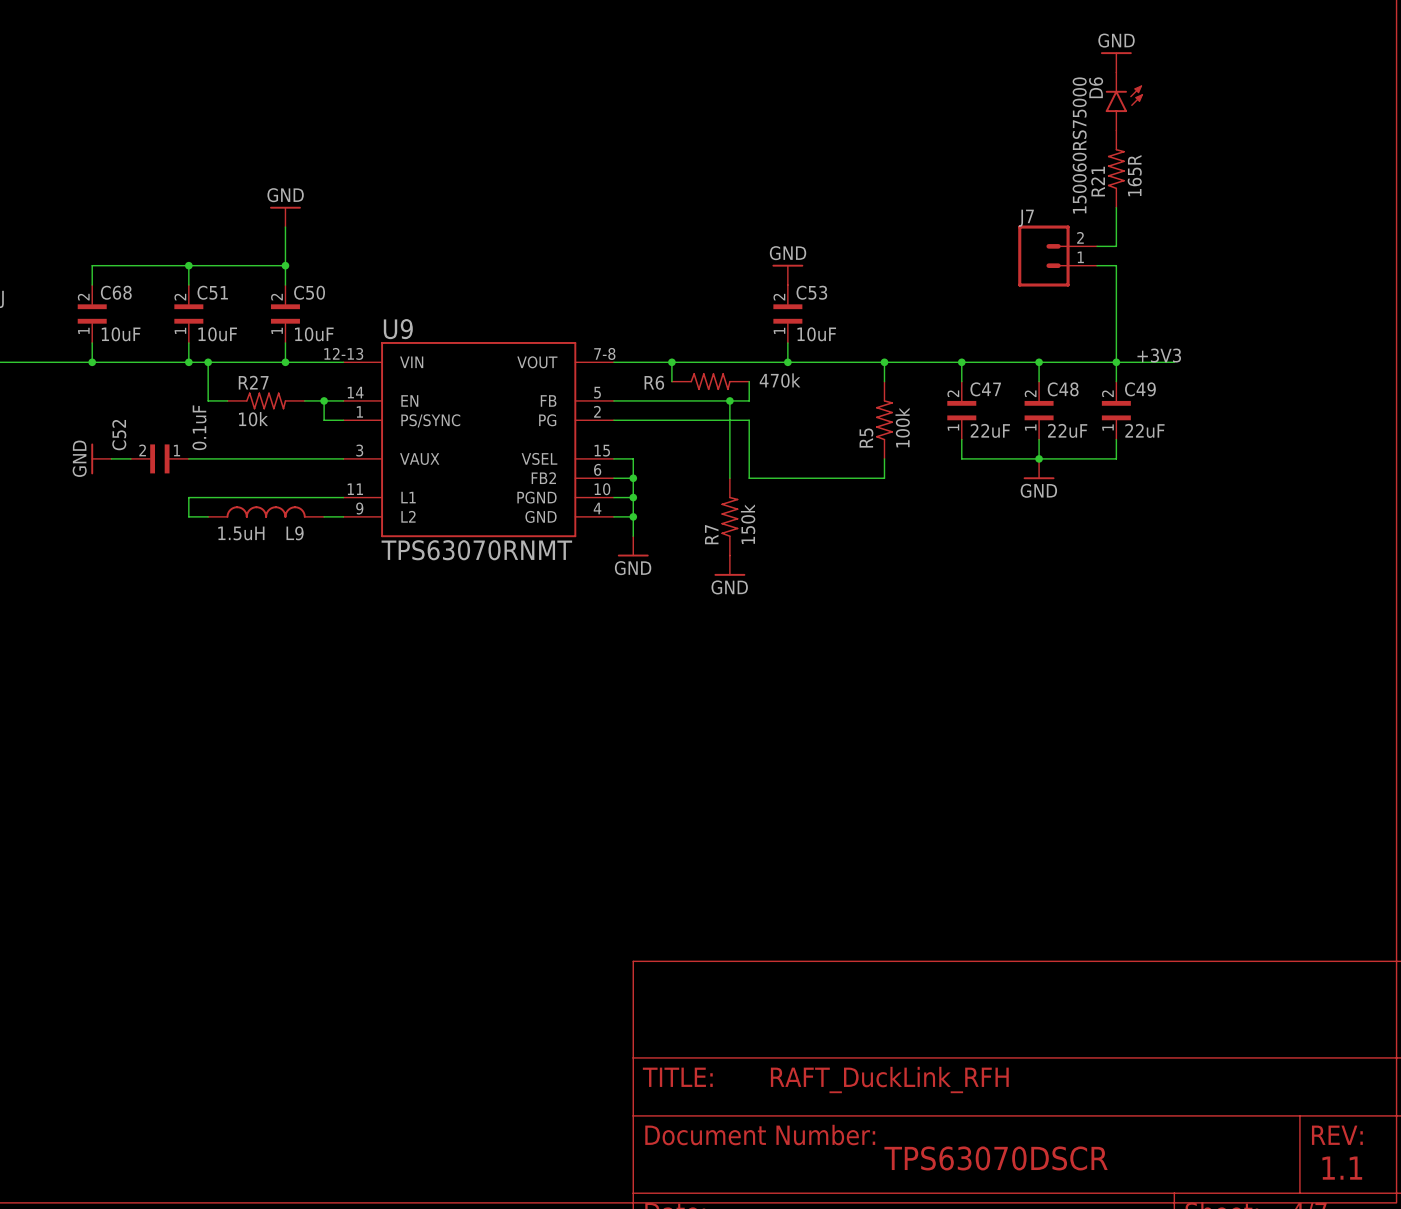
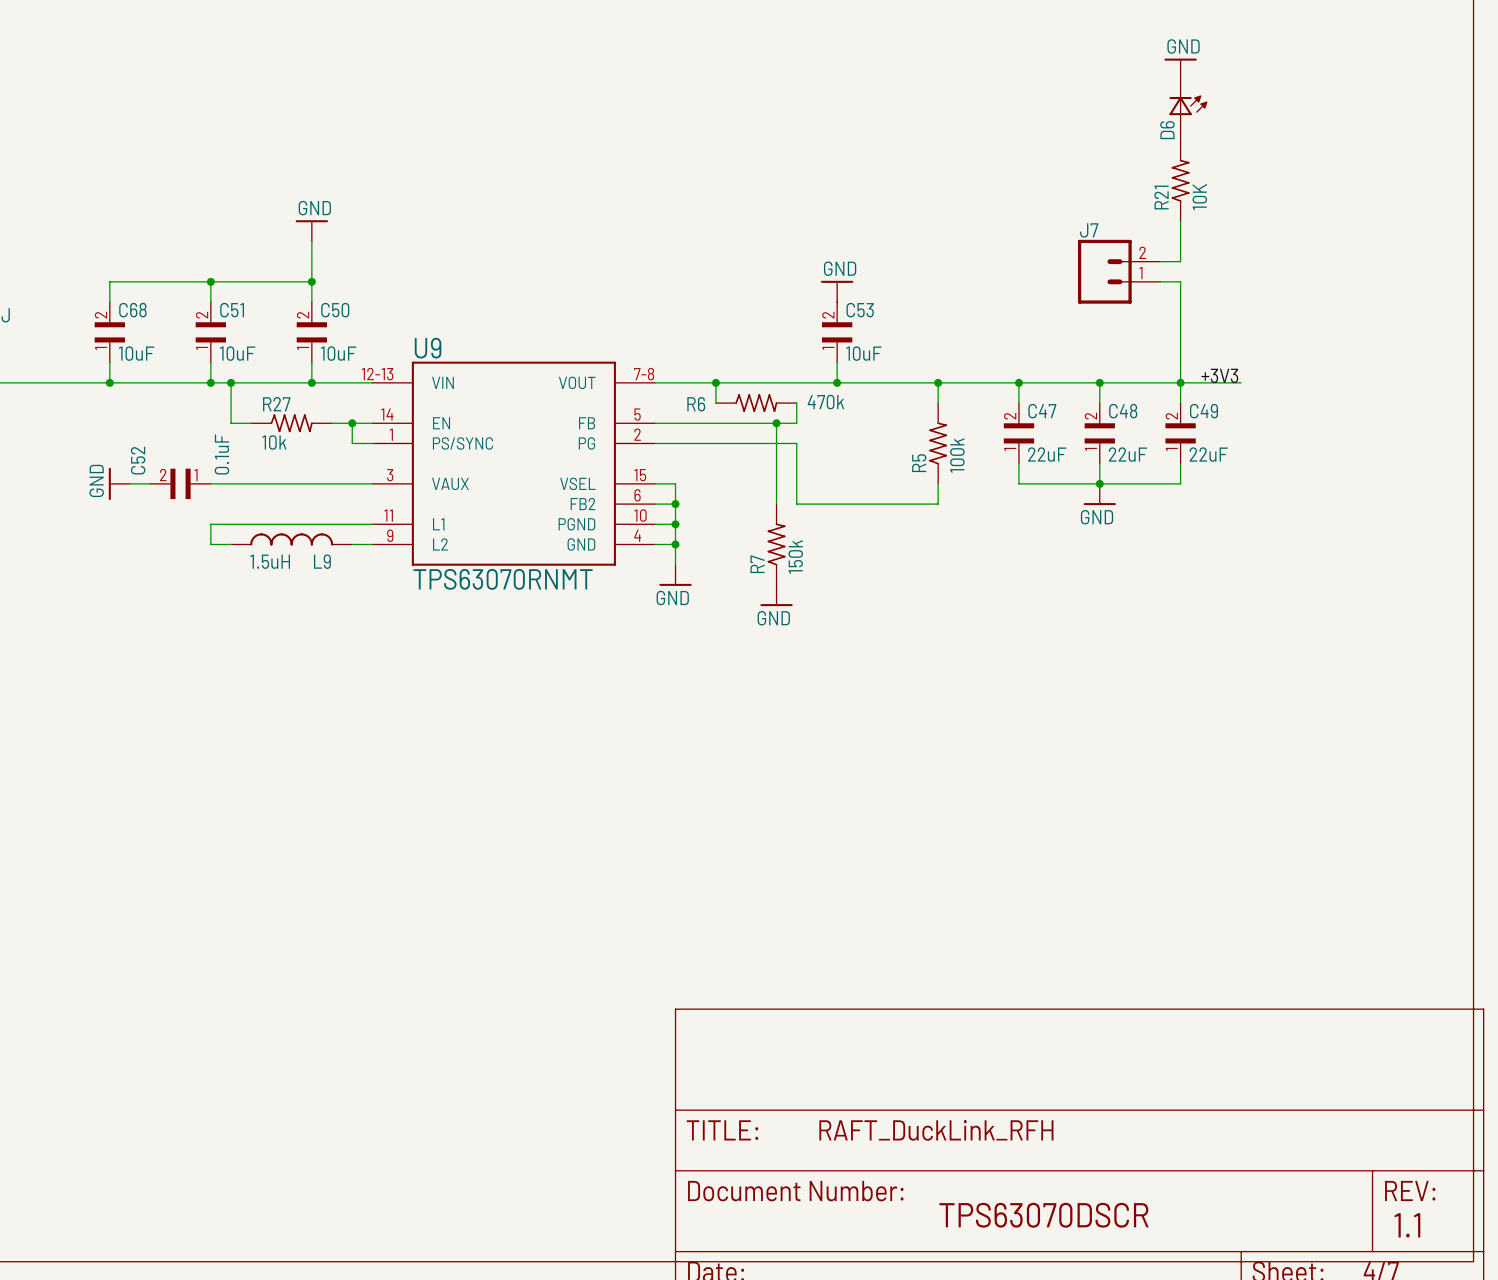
D6 symbol: [1105, 72, 1144, 131] -> [1169, 79, 1208, 141]
D6 name position: D6 (1096, 87) -> D6 (1167, 130)
D6 value: 150060RS75000 (1079, 145) -> none
R21 value: 165R (1134, 175) -> 10K (1199, 196)

